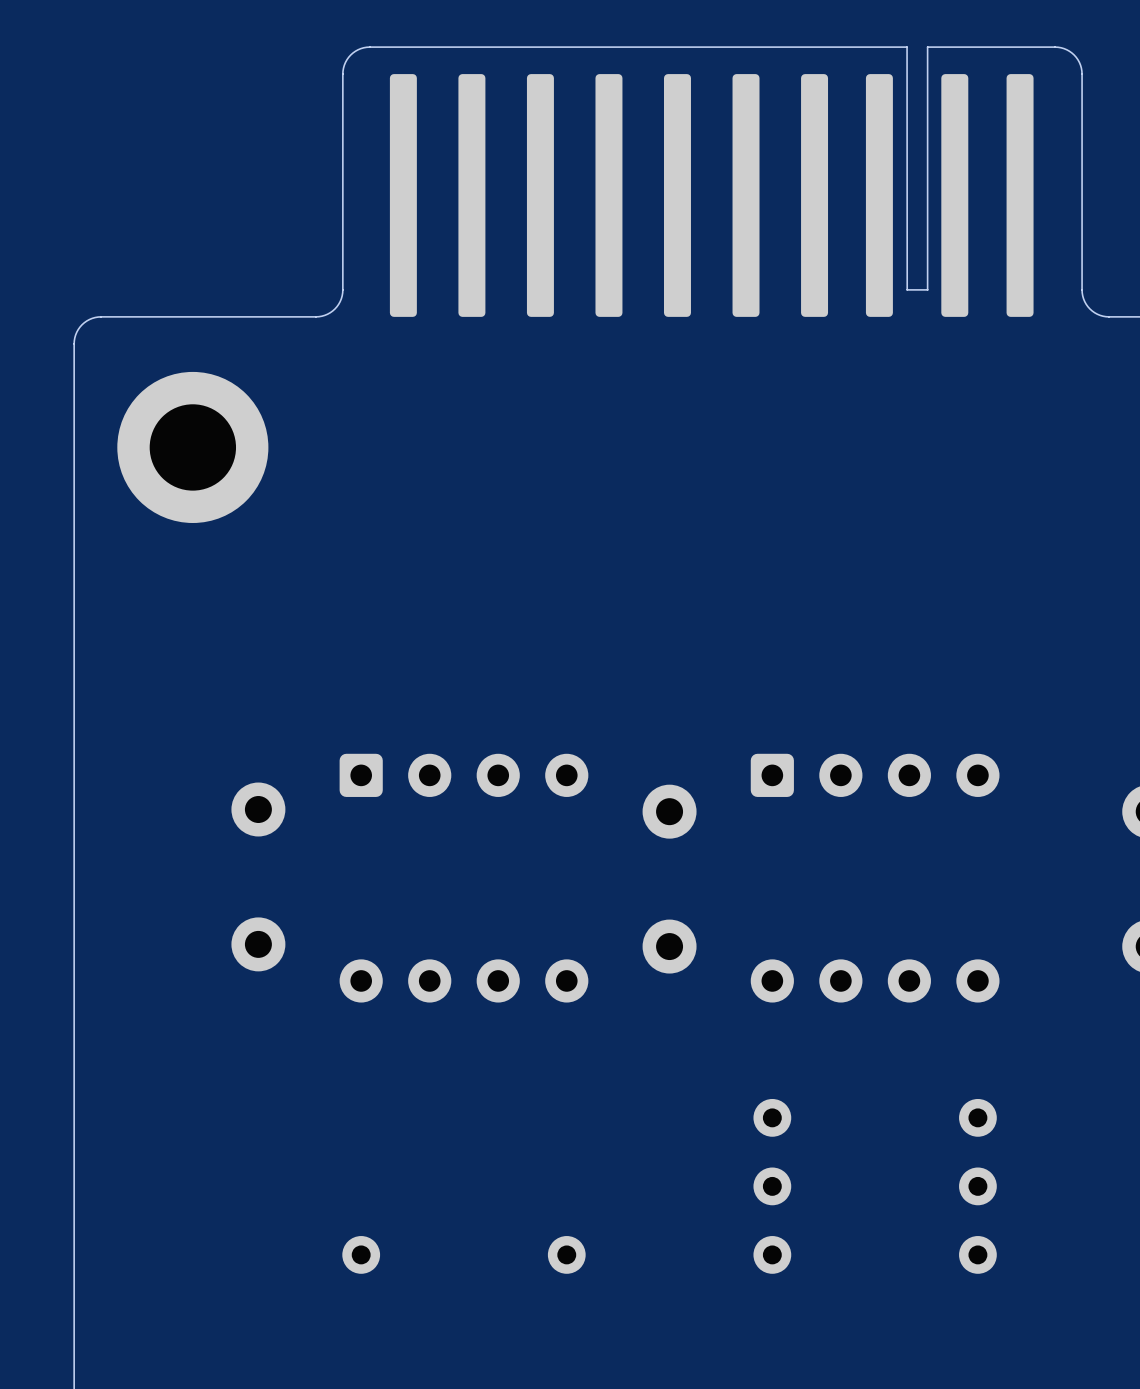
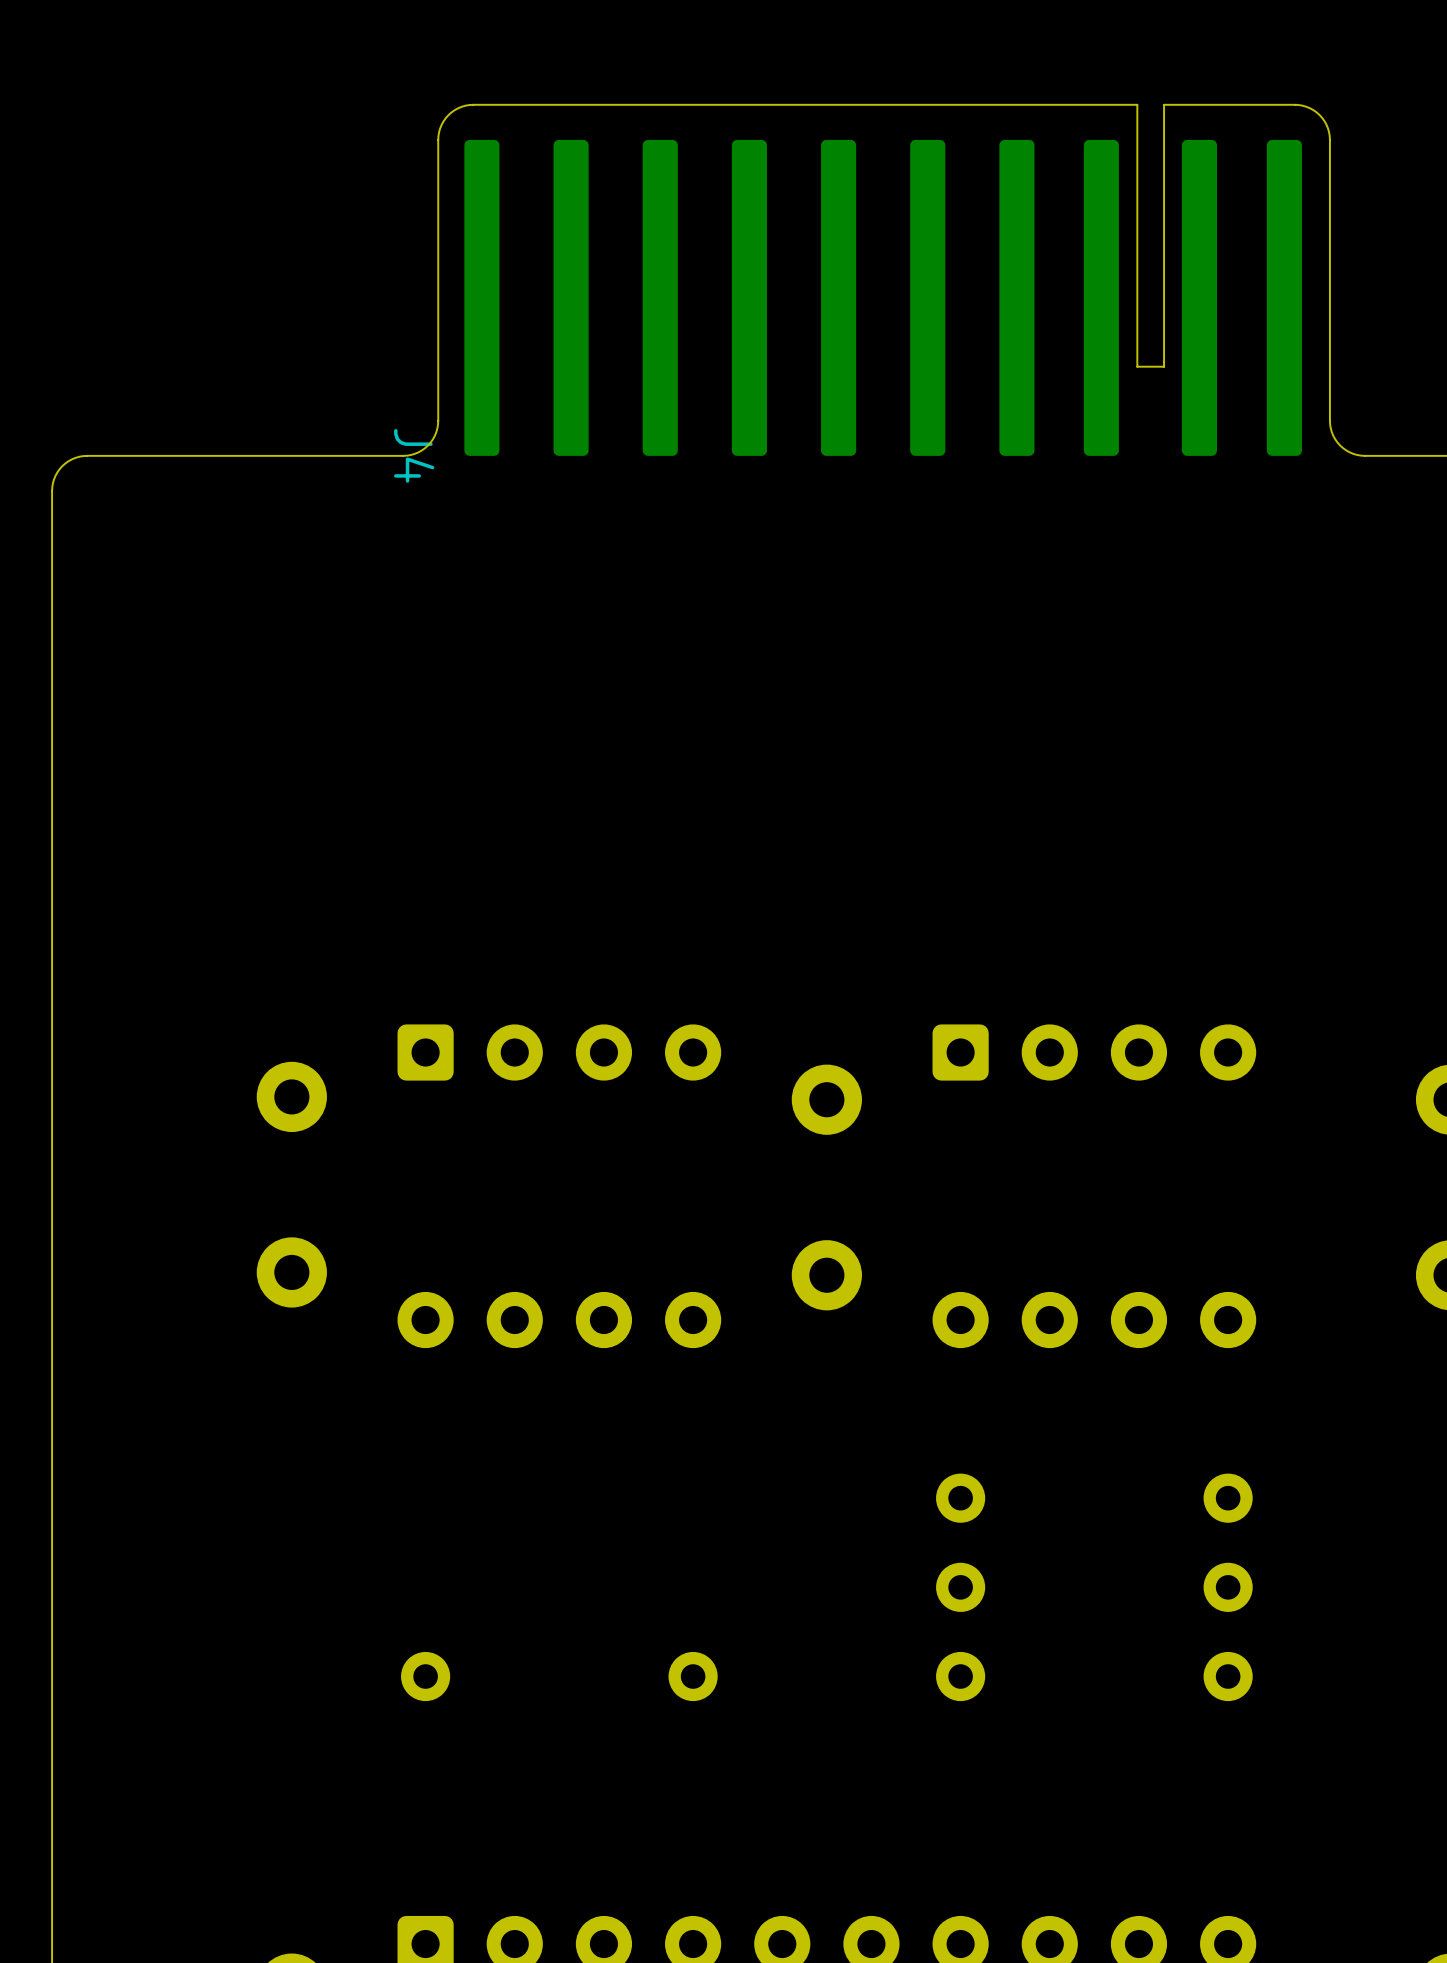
part: (712, 181) -> none
J4: none -> (884, 280)
board edge: none -> (403, 455) (366, 455)
board edge: none -> (1398, 455) (1365, 455)
part: (192, 447) -> none

